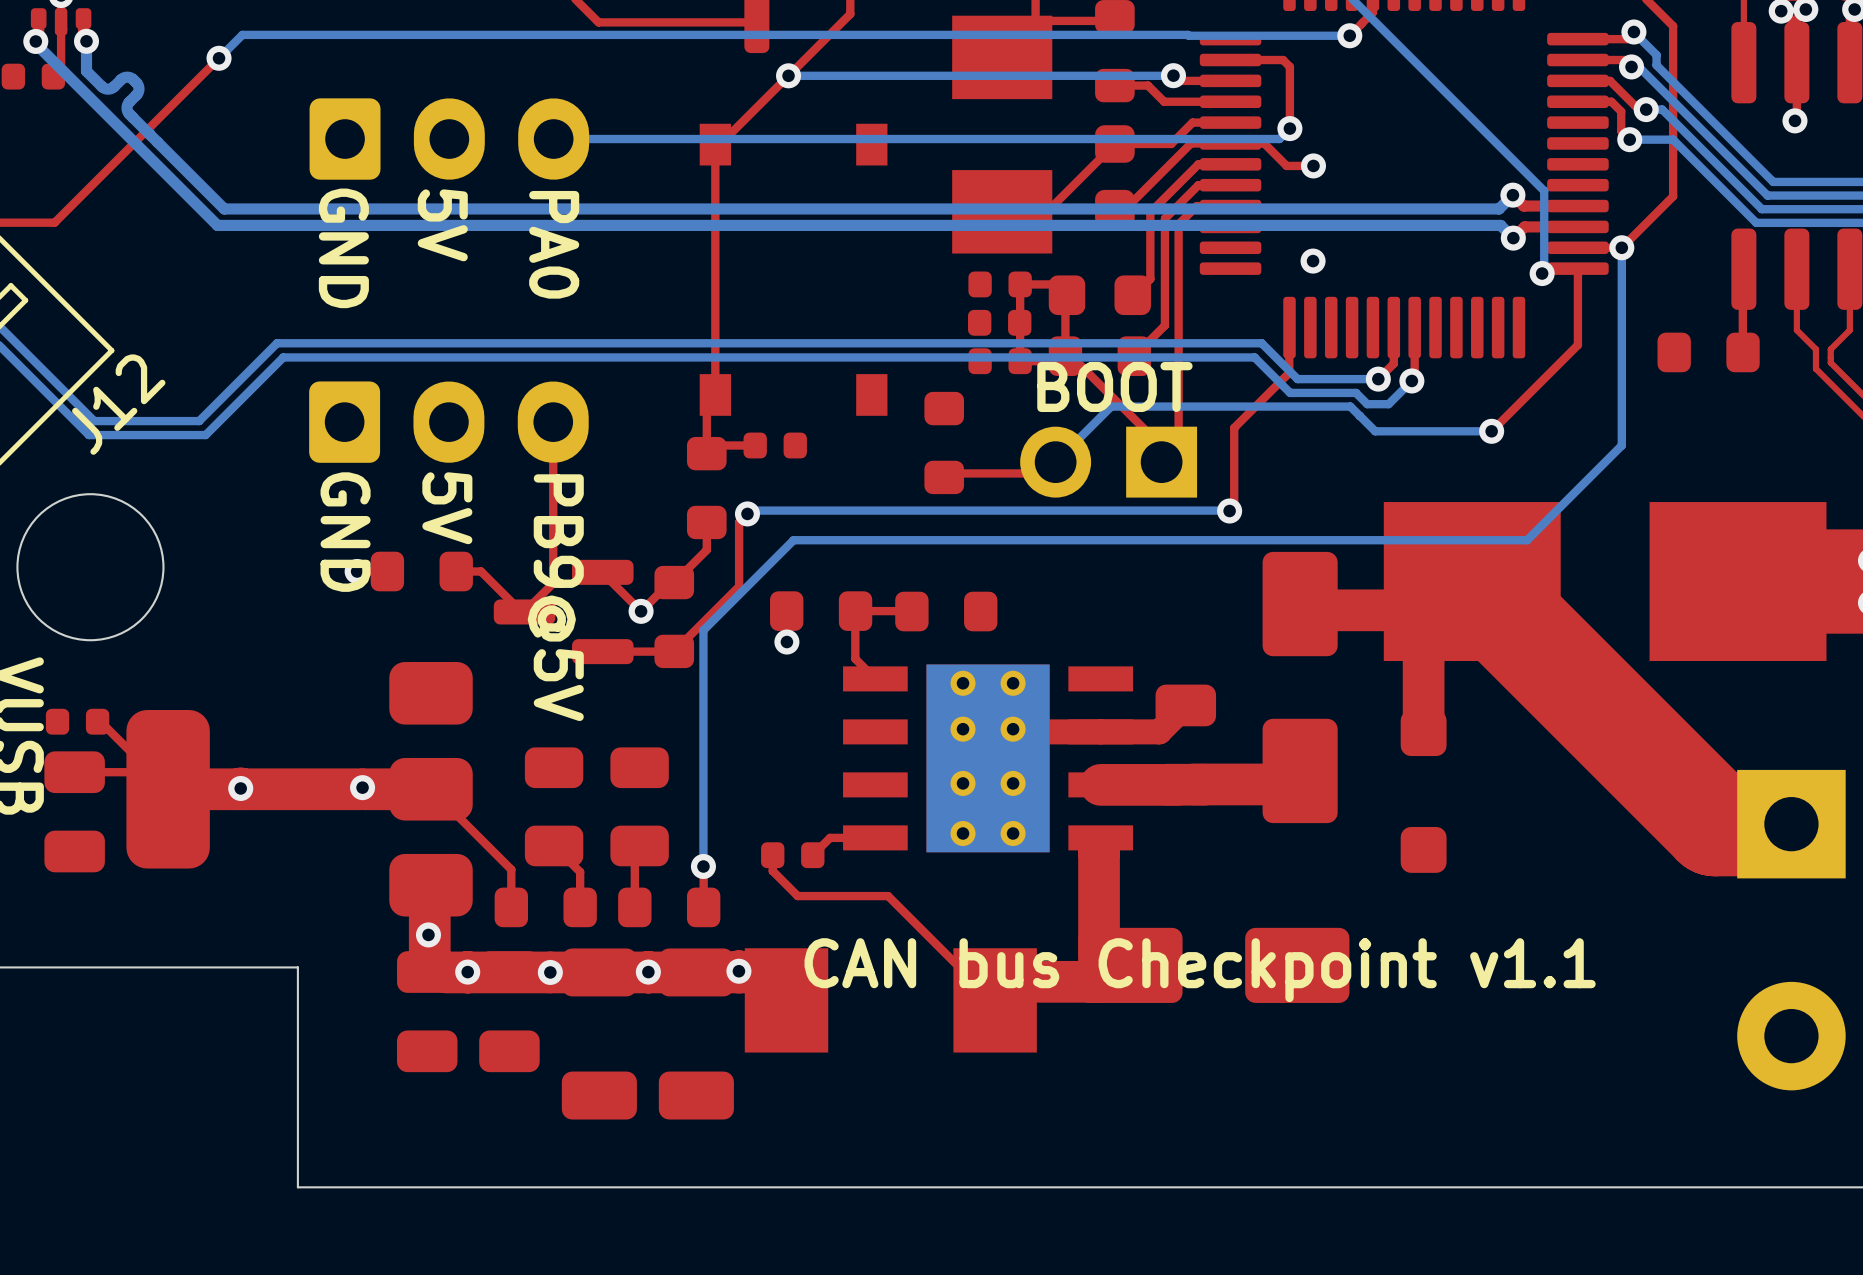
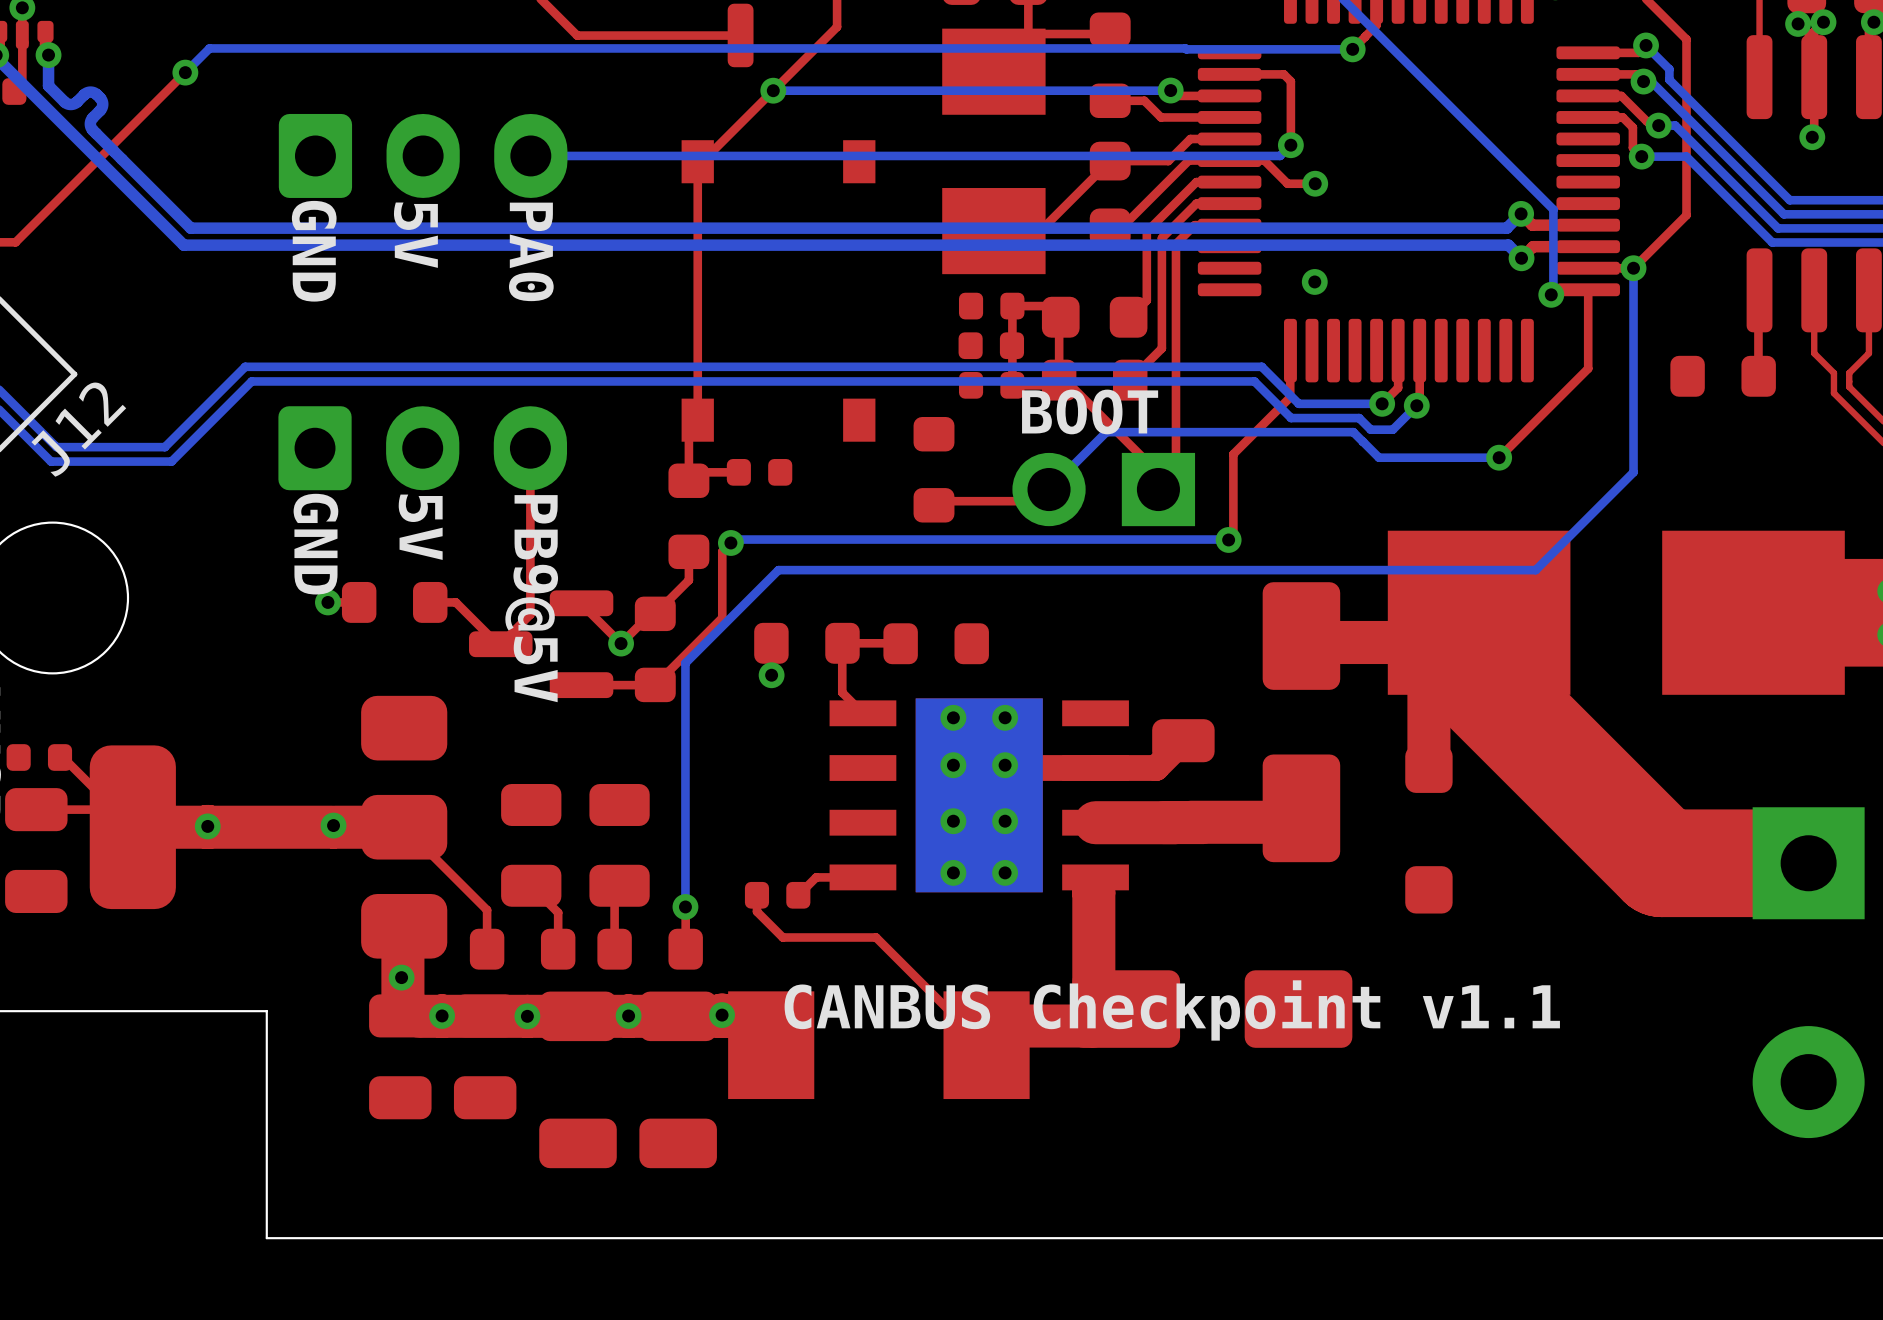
top track: (1472, 581) (1714, 824) -> (1479, 612) (1479, 680) (1661, 863) (1729, 863)
text: CAN bus Checkpoint v1.1 (1200, 970) -> CANBUS Checkpoint v1.1 (1172, 1010)

